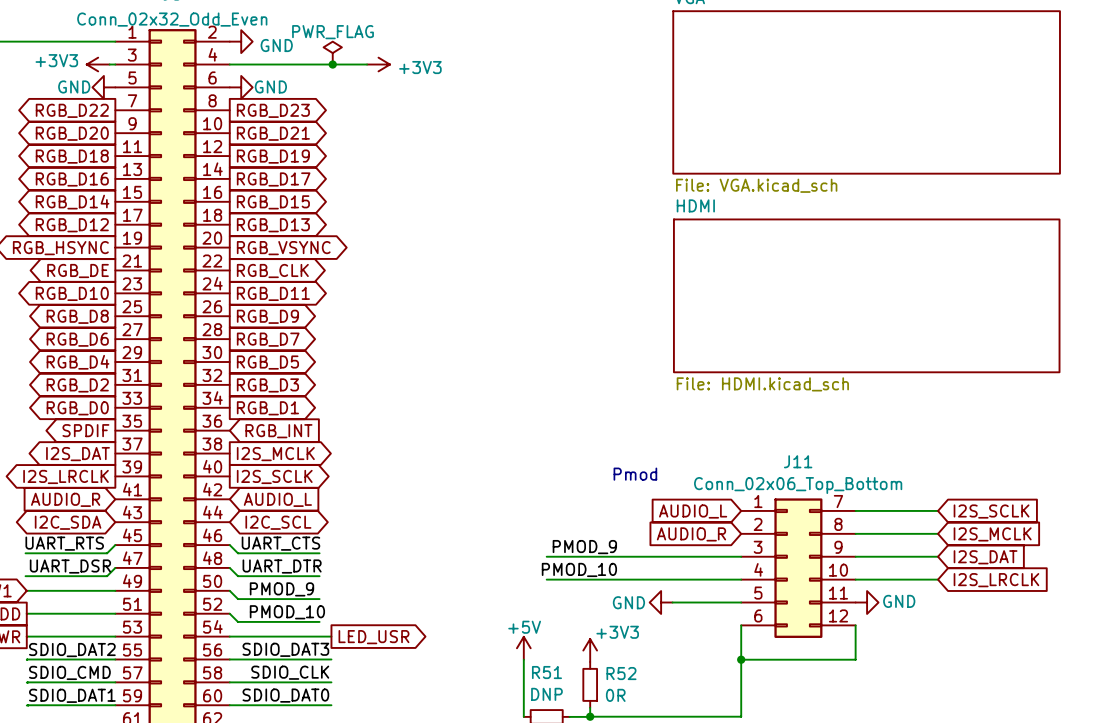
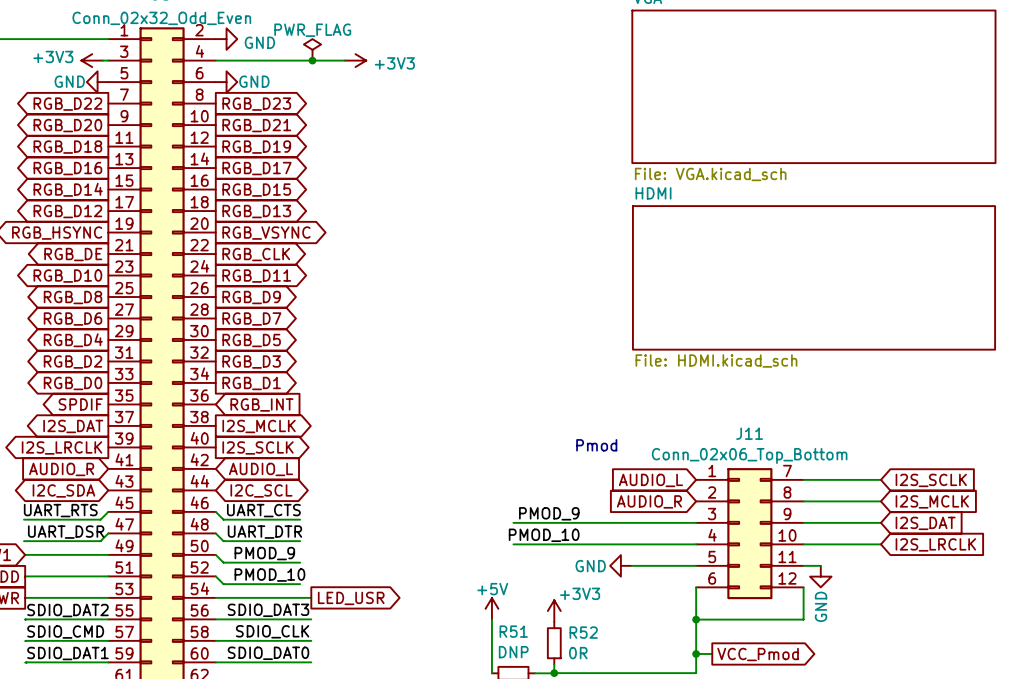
power symbol rotation: 0° (867, 602) -> 90° clockwise (820, 576)
wire: none -> (696, 653) (712, 653)
junction: none -> (696, 653)
global label: none -> VCC_Pmod (758, 654)

